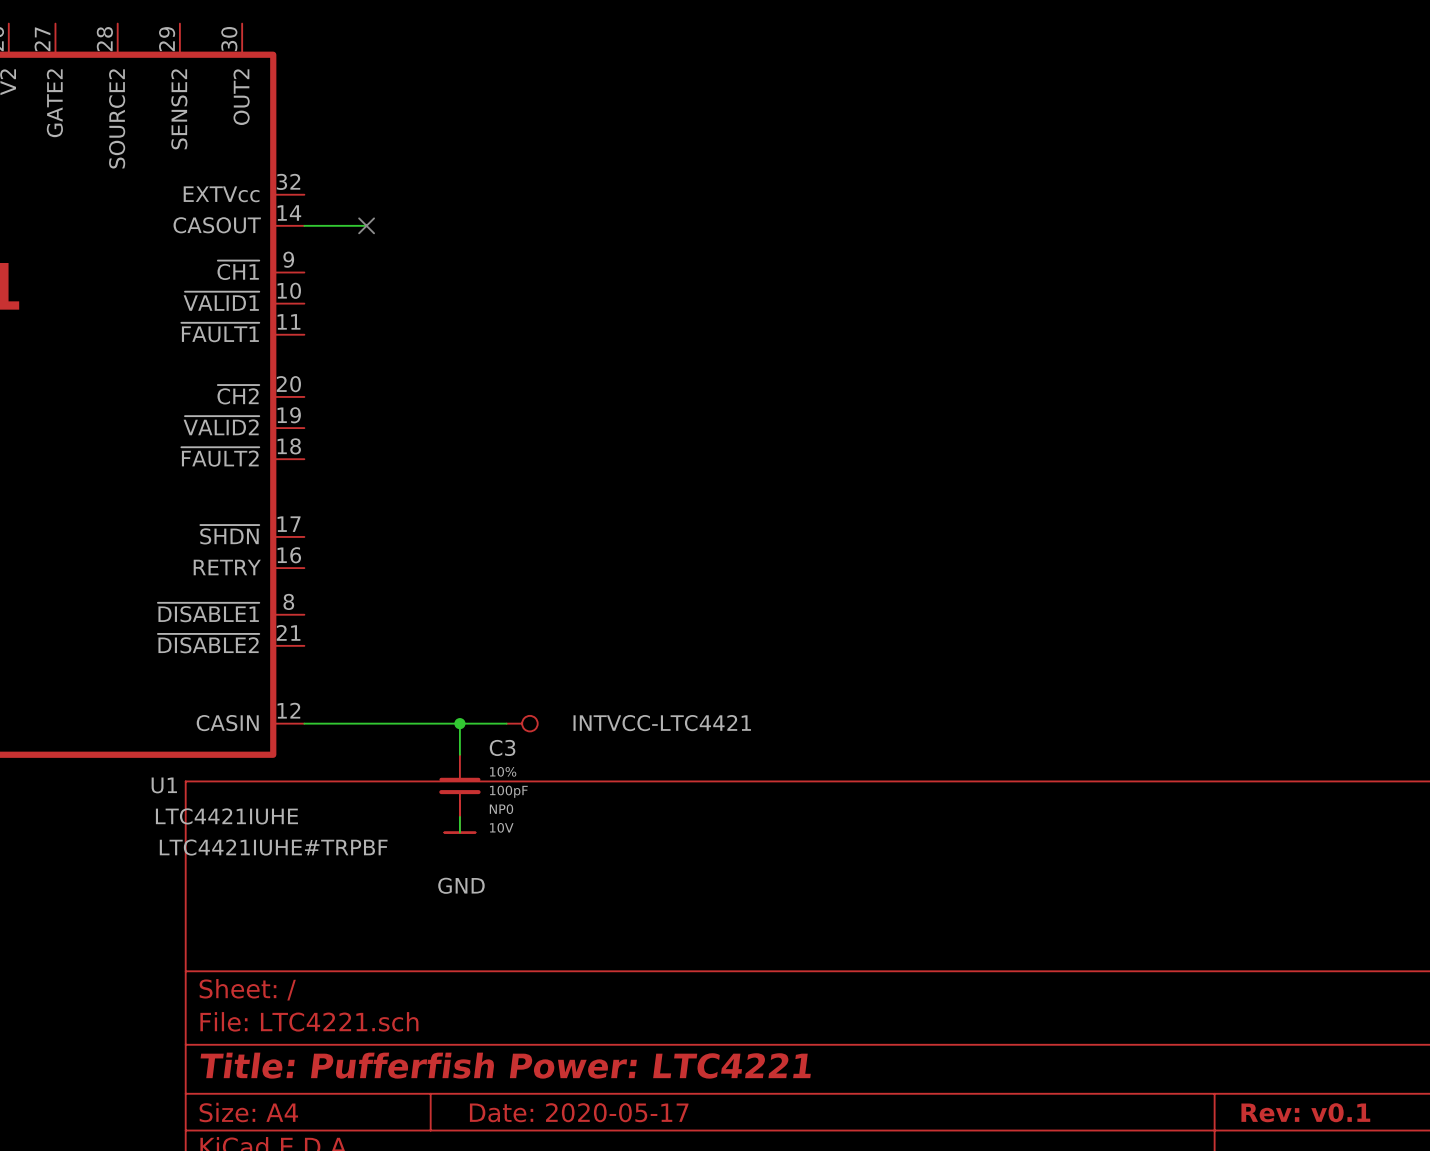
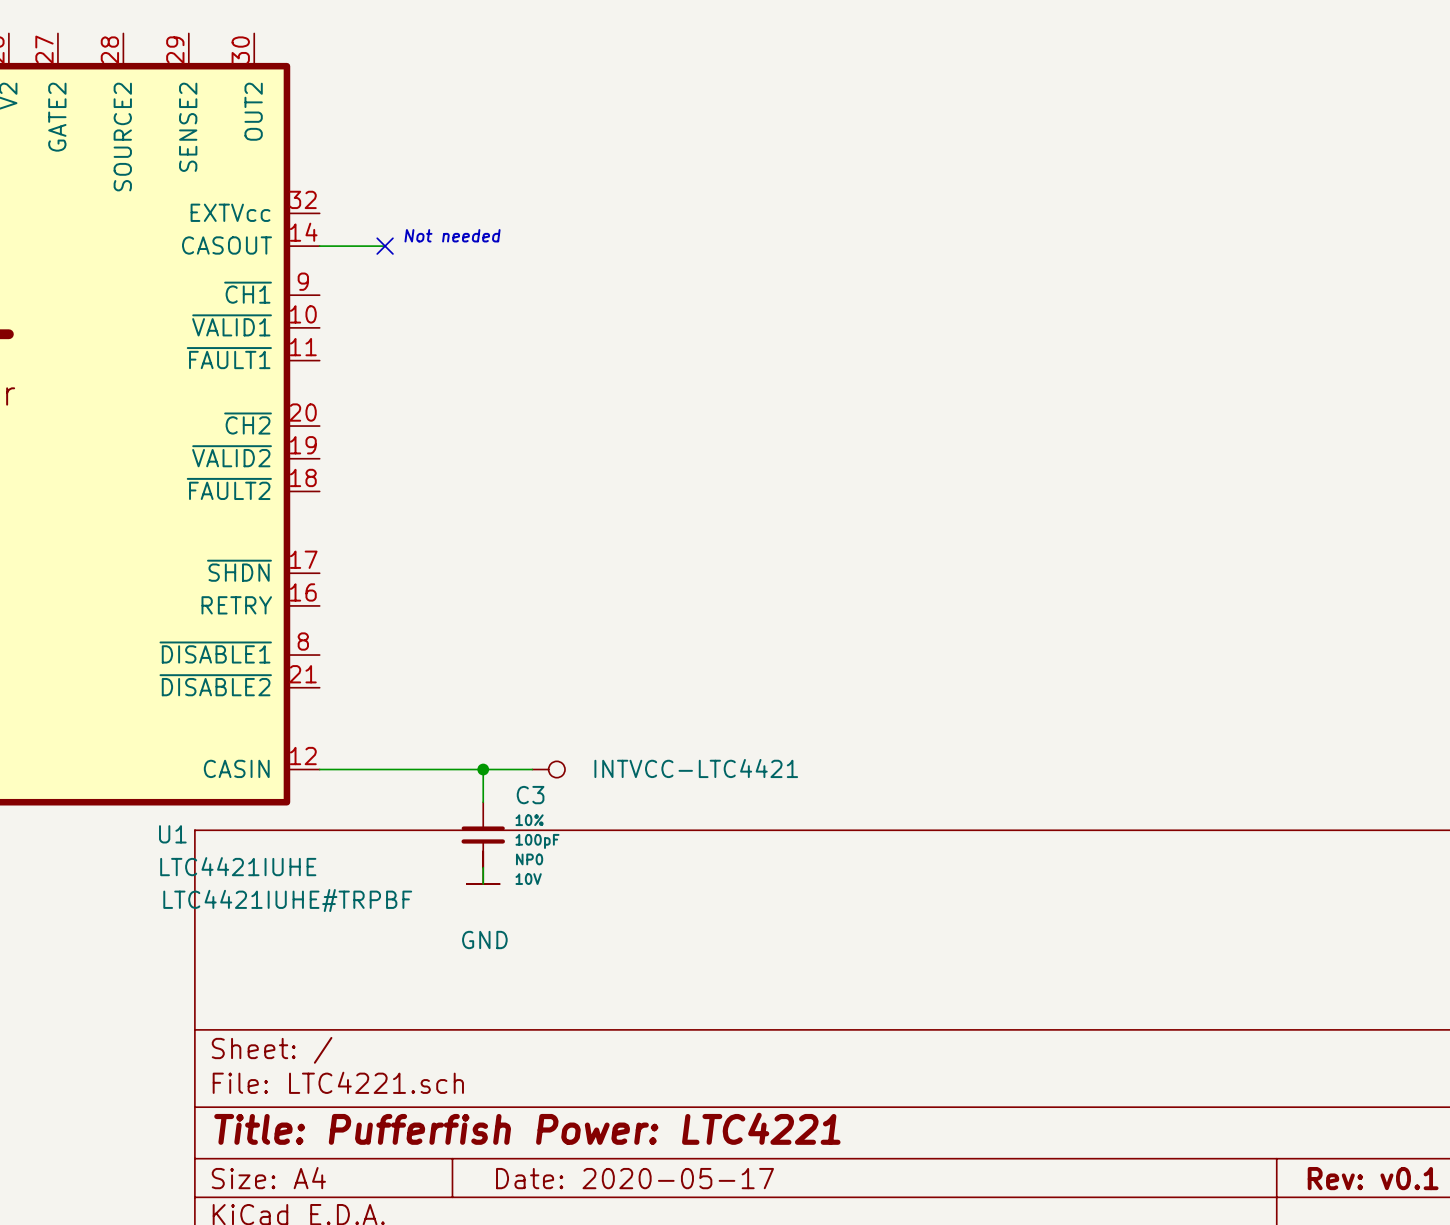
text: none -> Not needed (452, 235)

